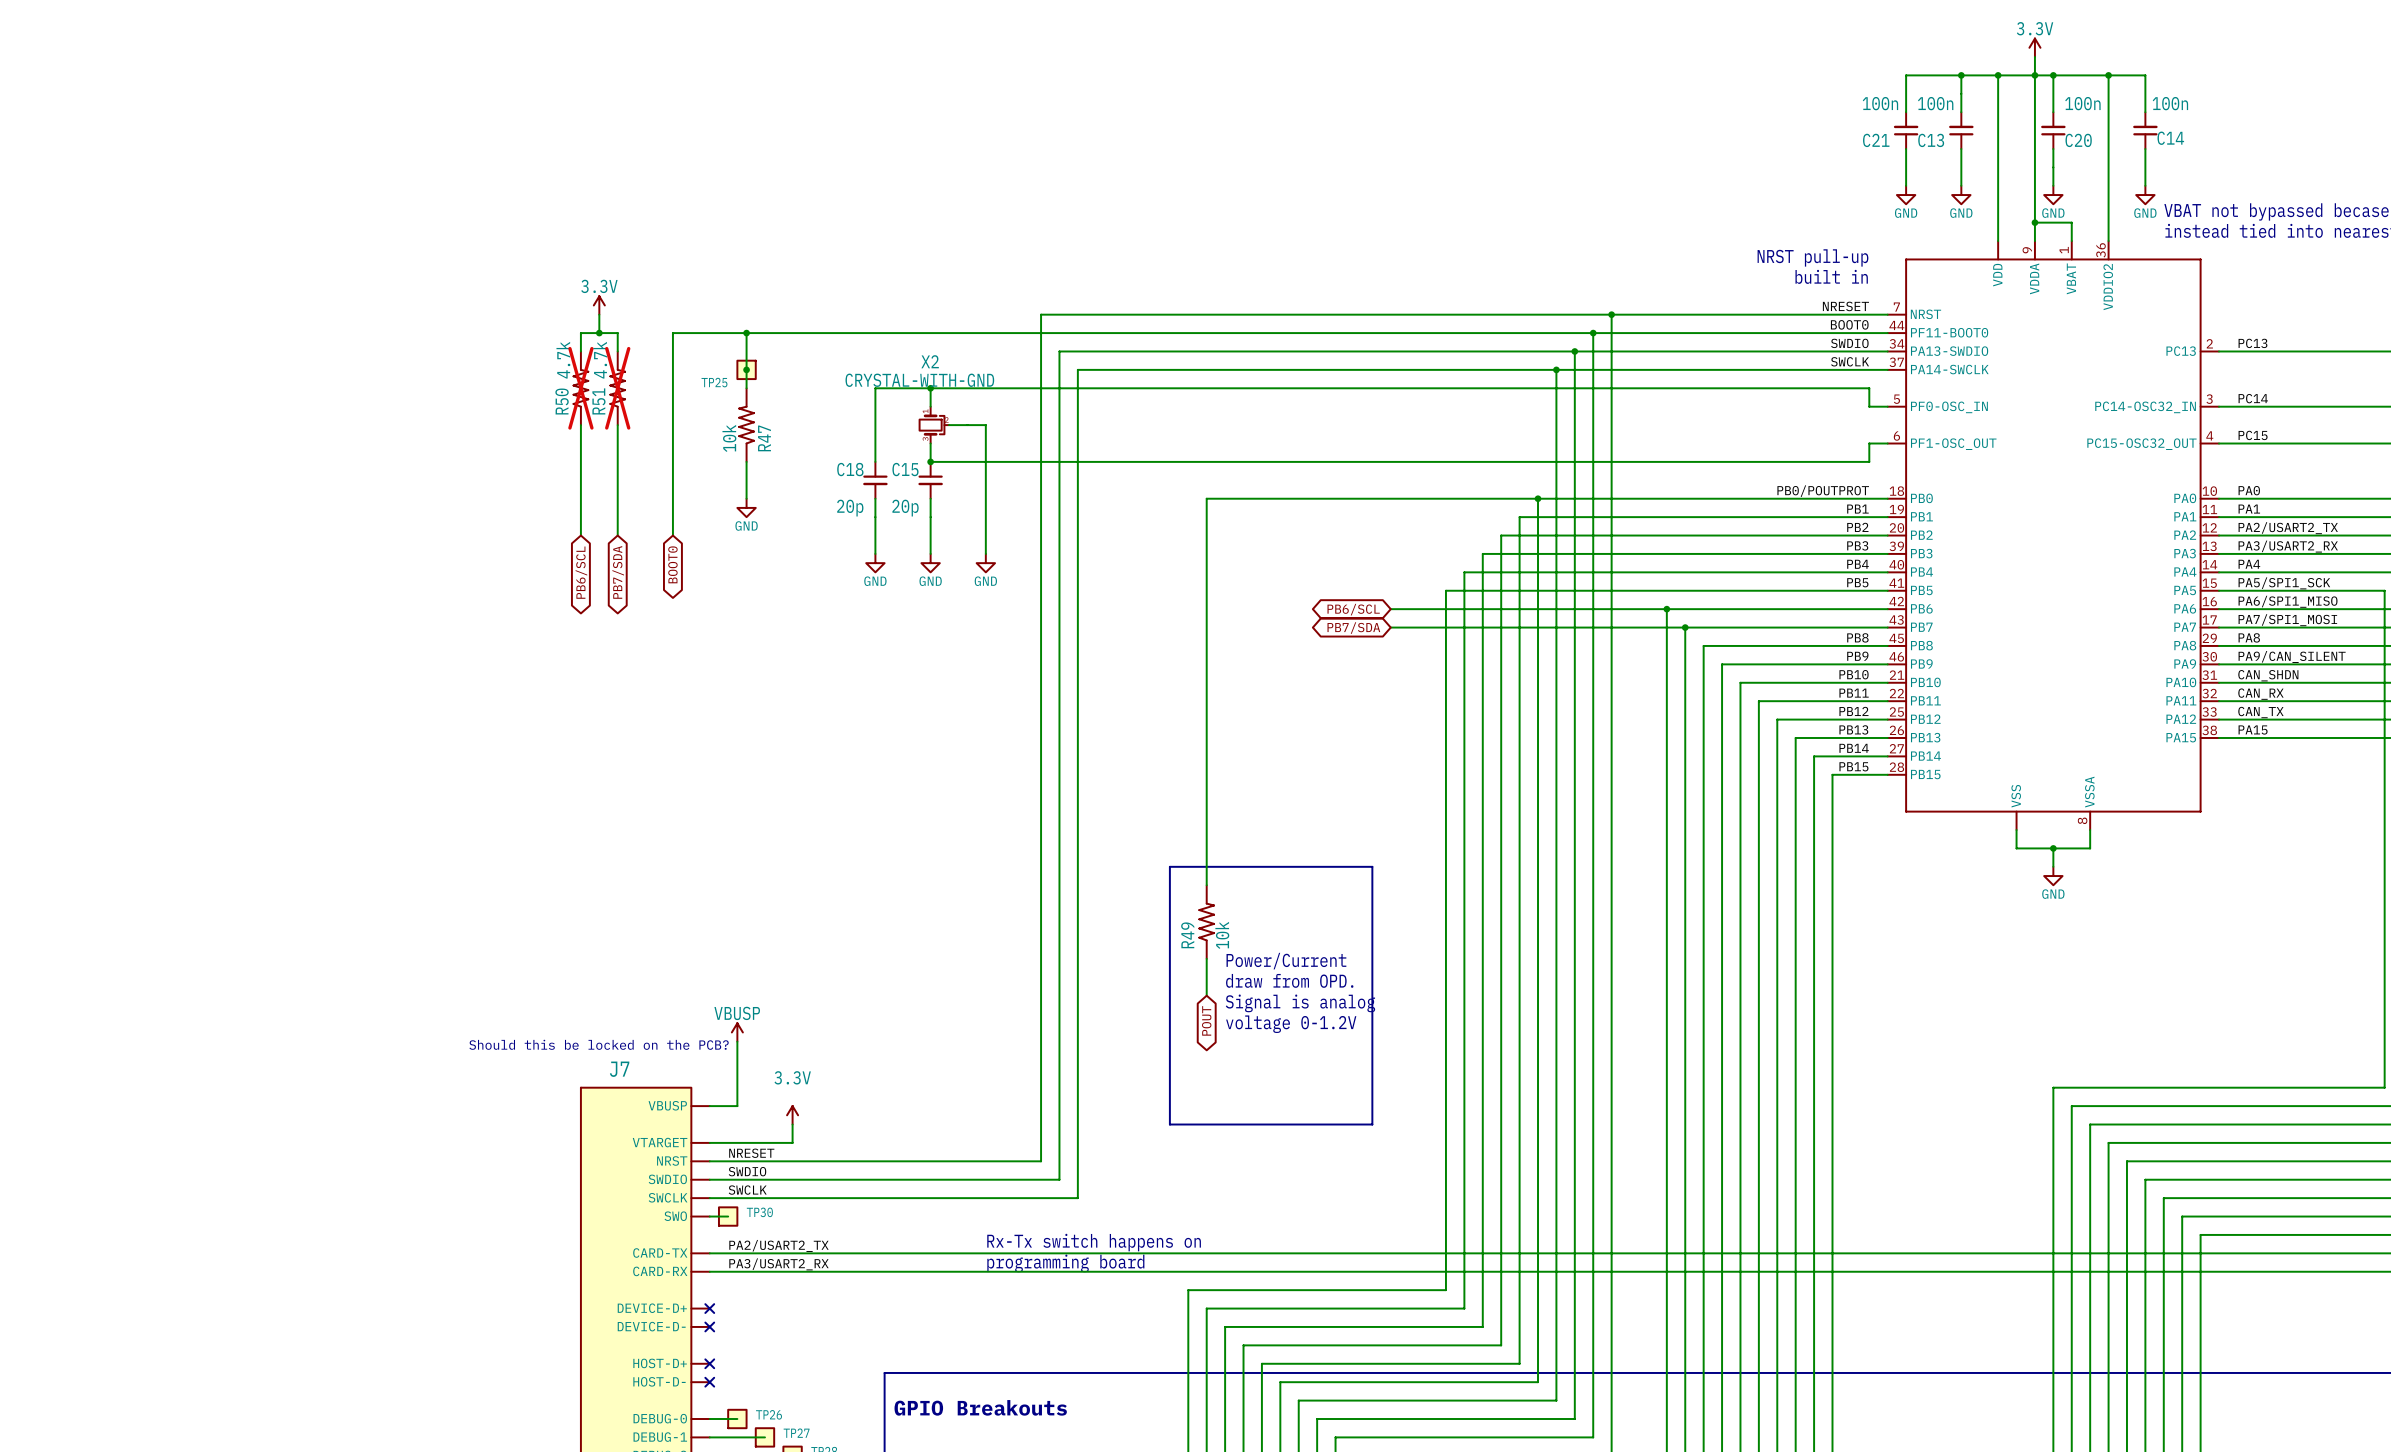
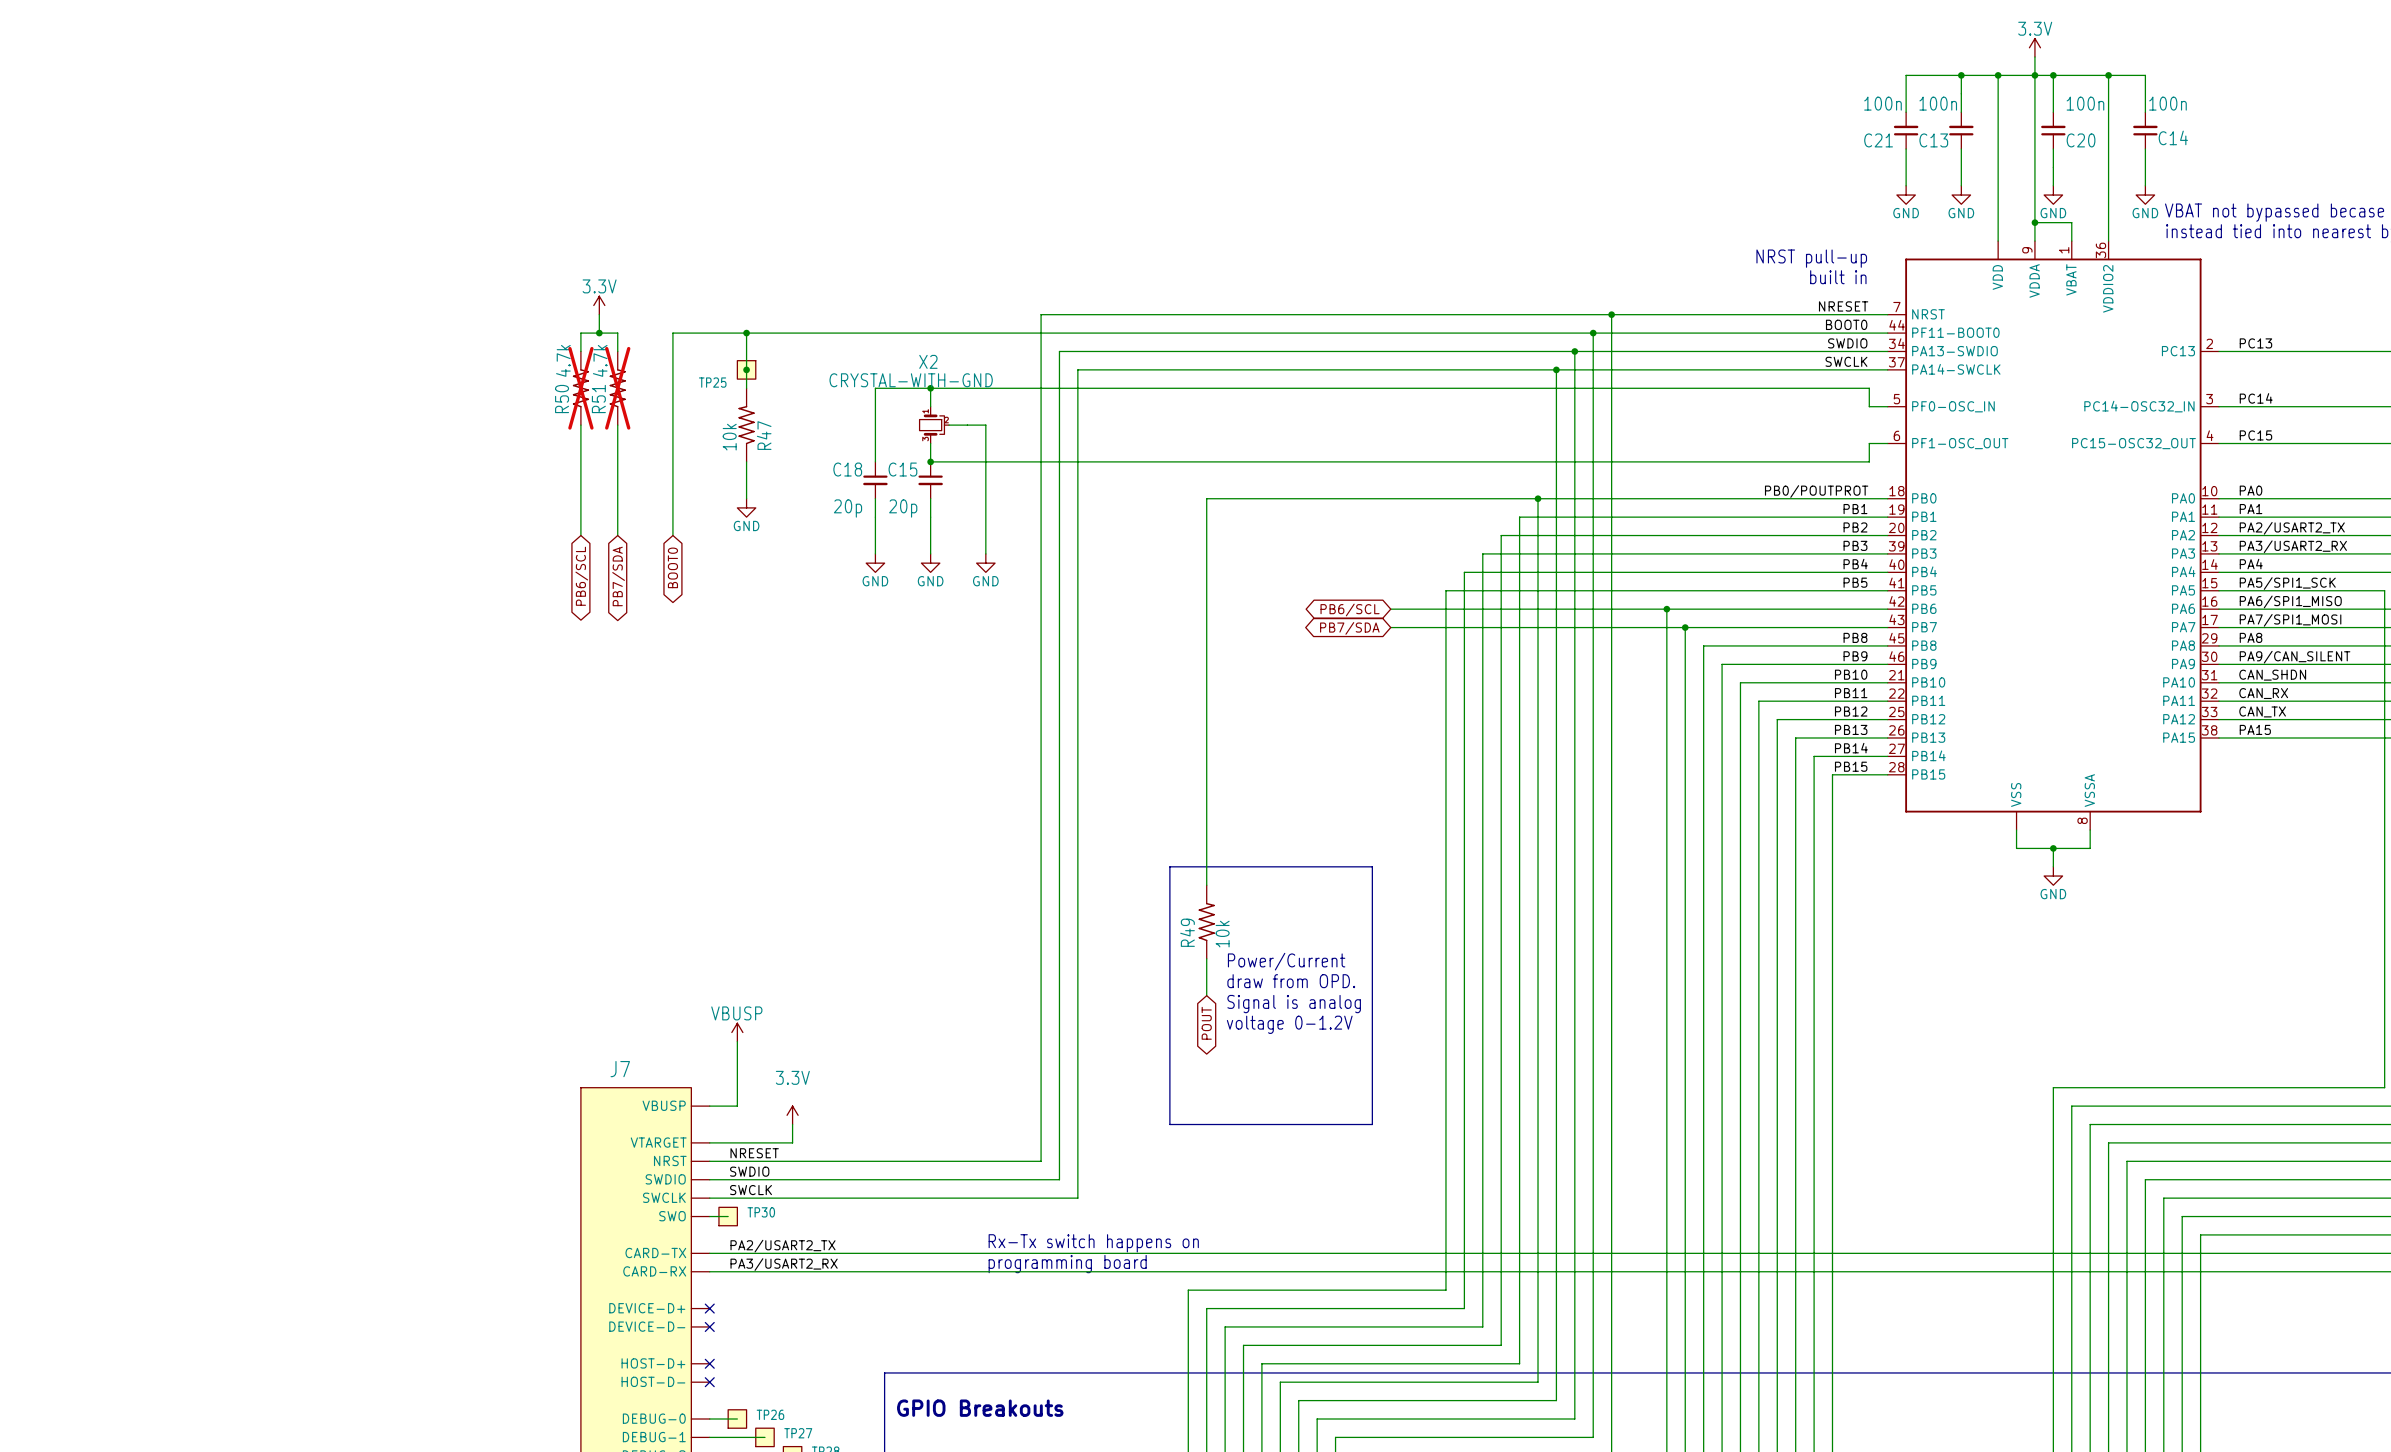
text: Should this be locked on the PCB? (599, 1044) -> none

